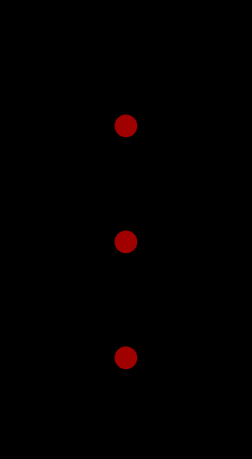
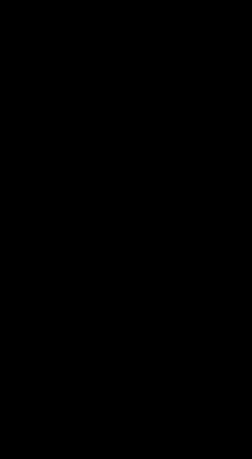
part: (125, 125) -> none
part: (125, 241) -> none
part: (125, 357) -> none

